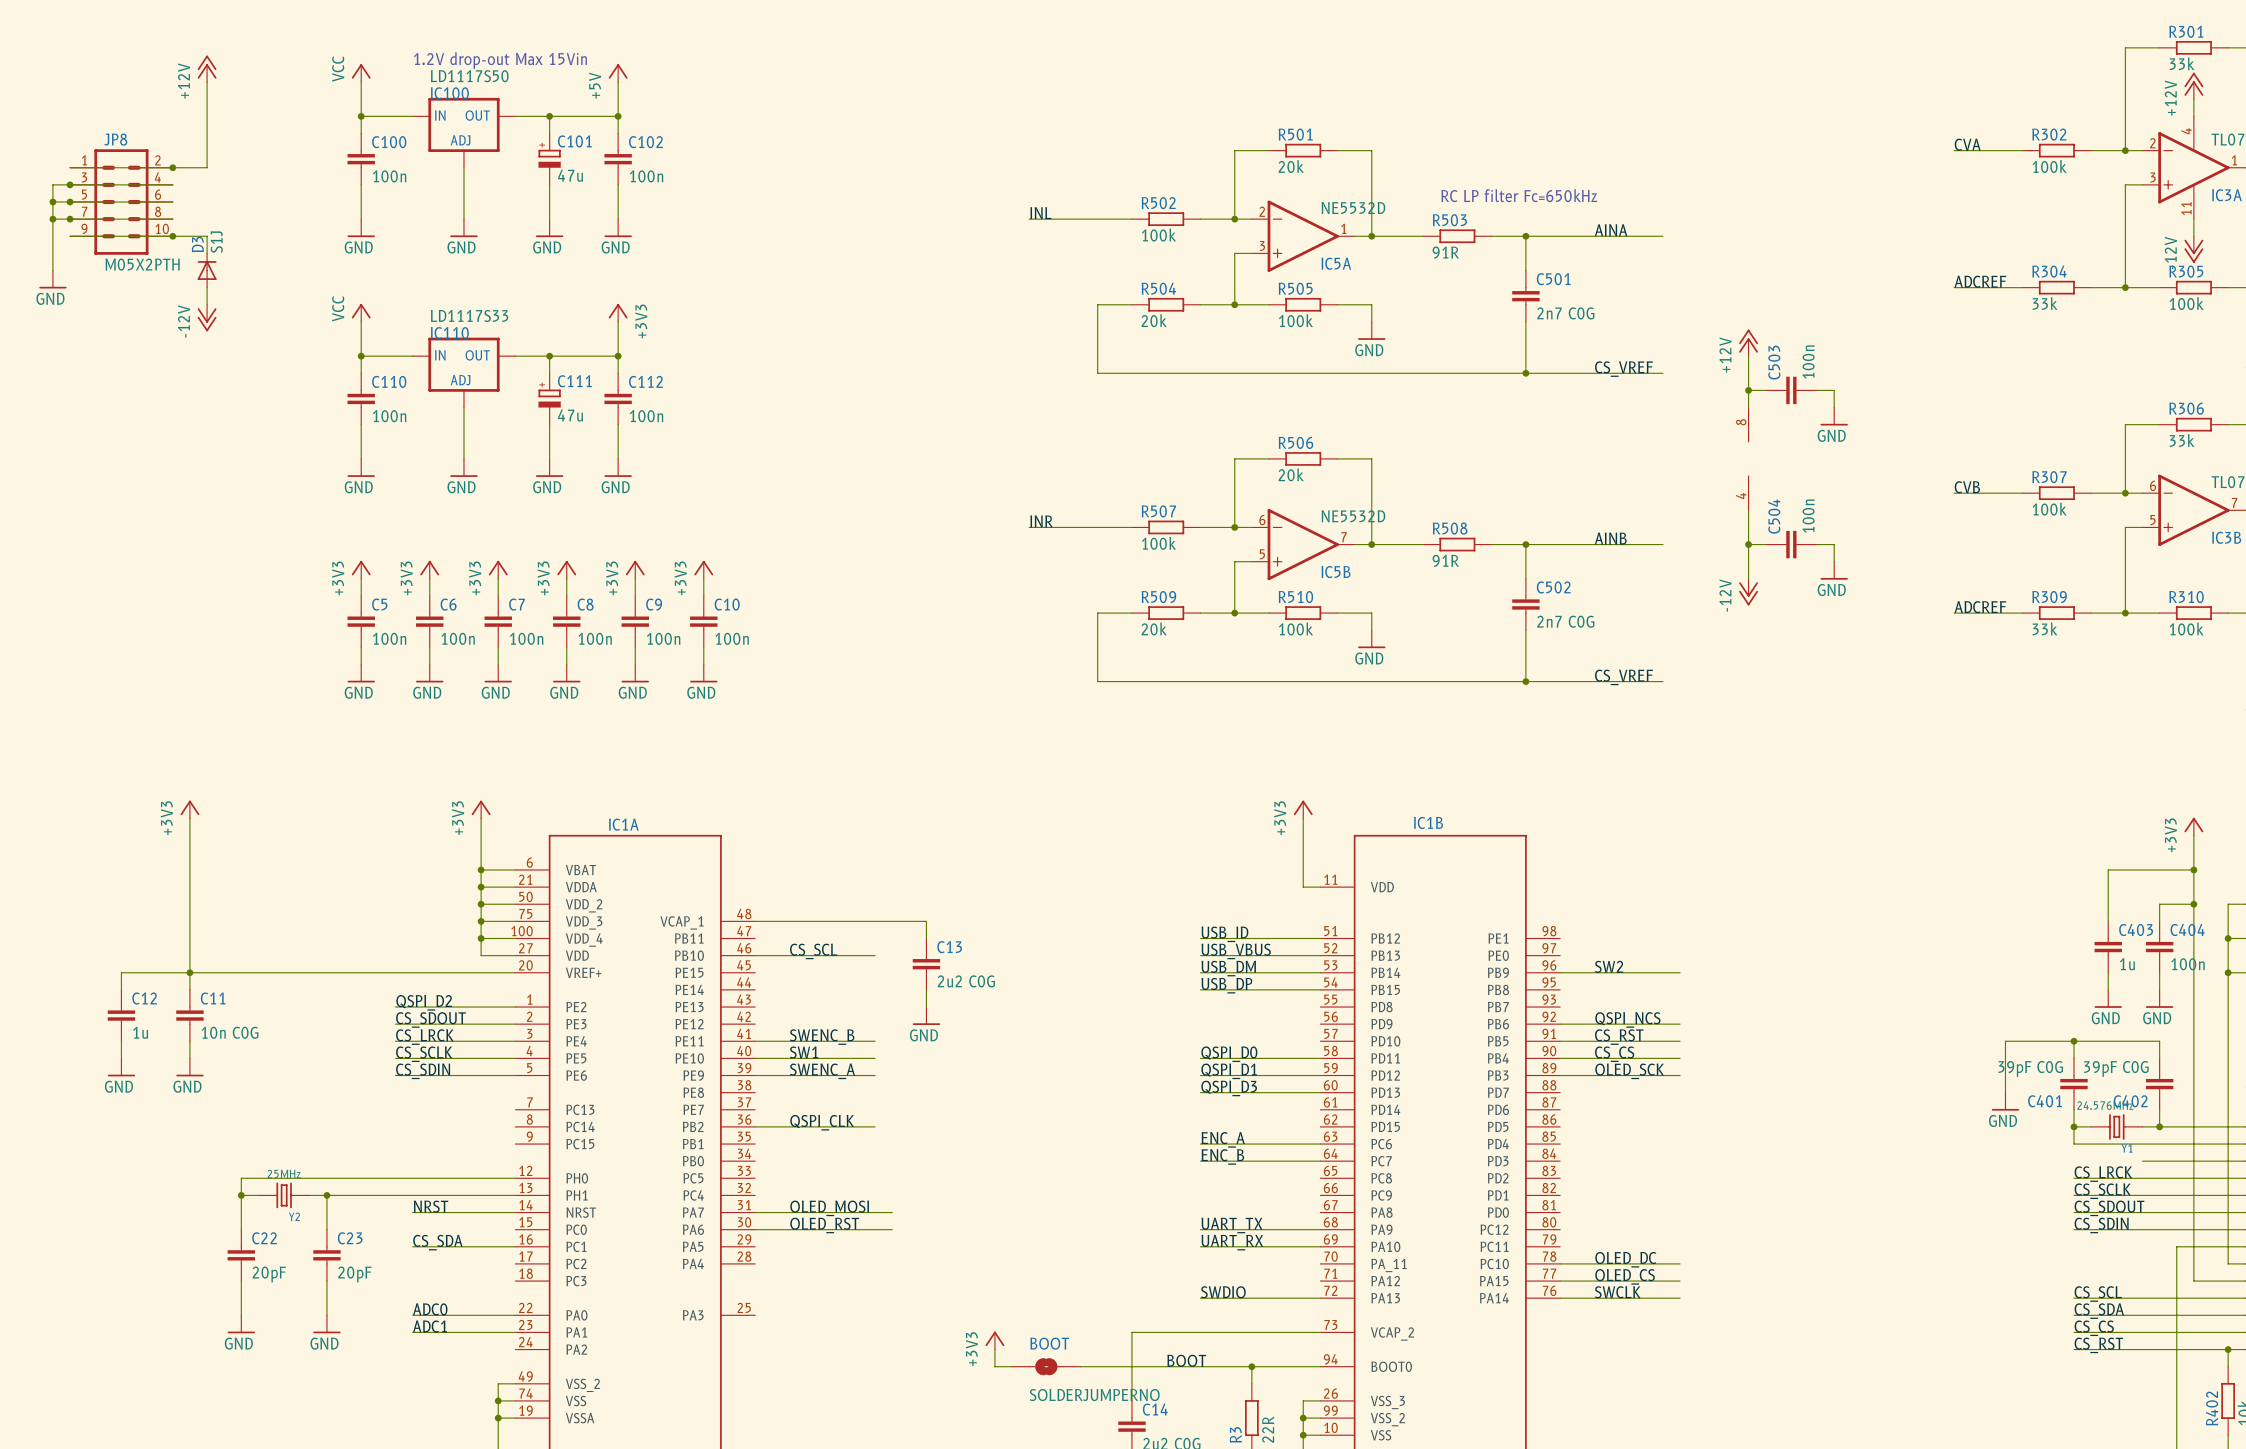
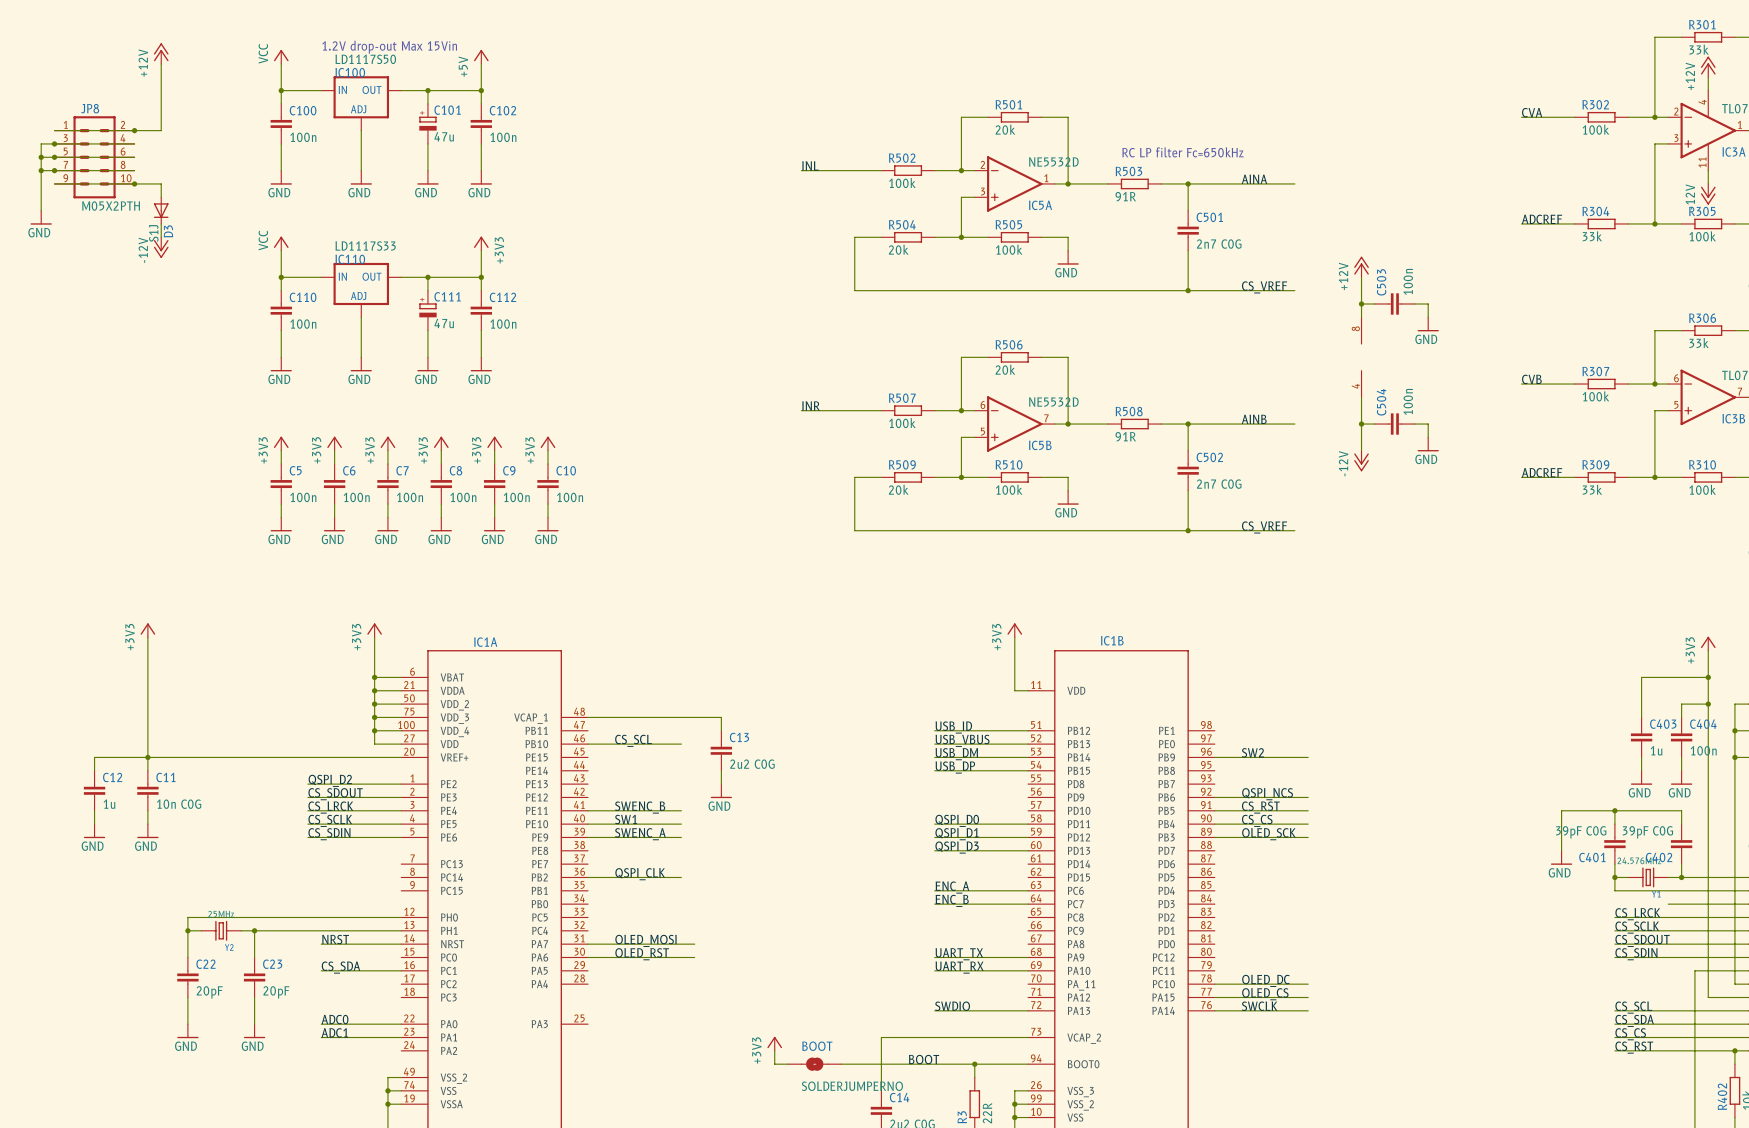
D3 rotation: 0° (207, 270) -> 180° (161, 210)

